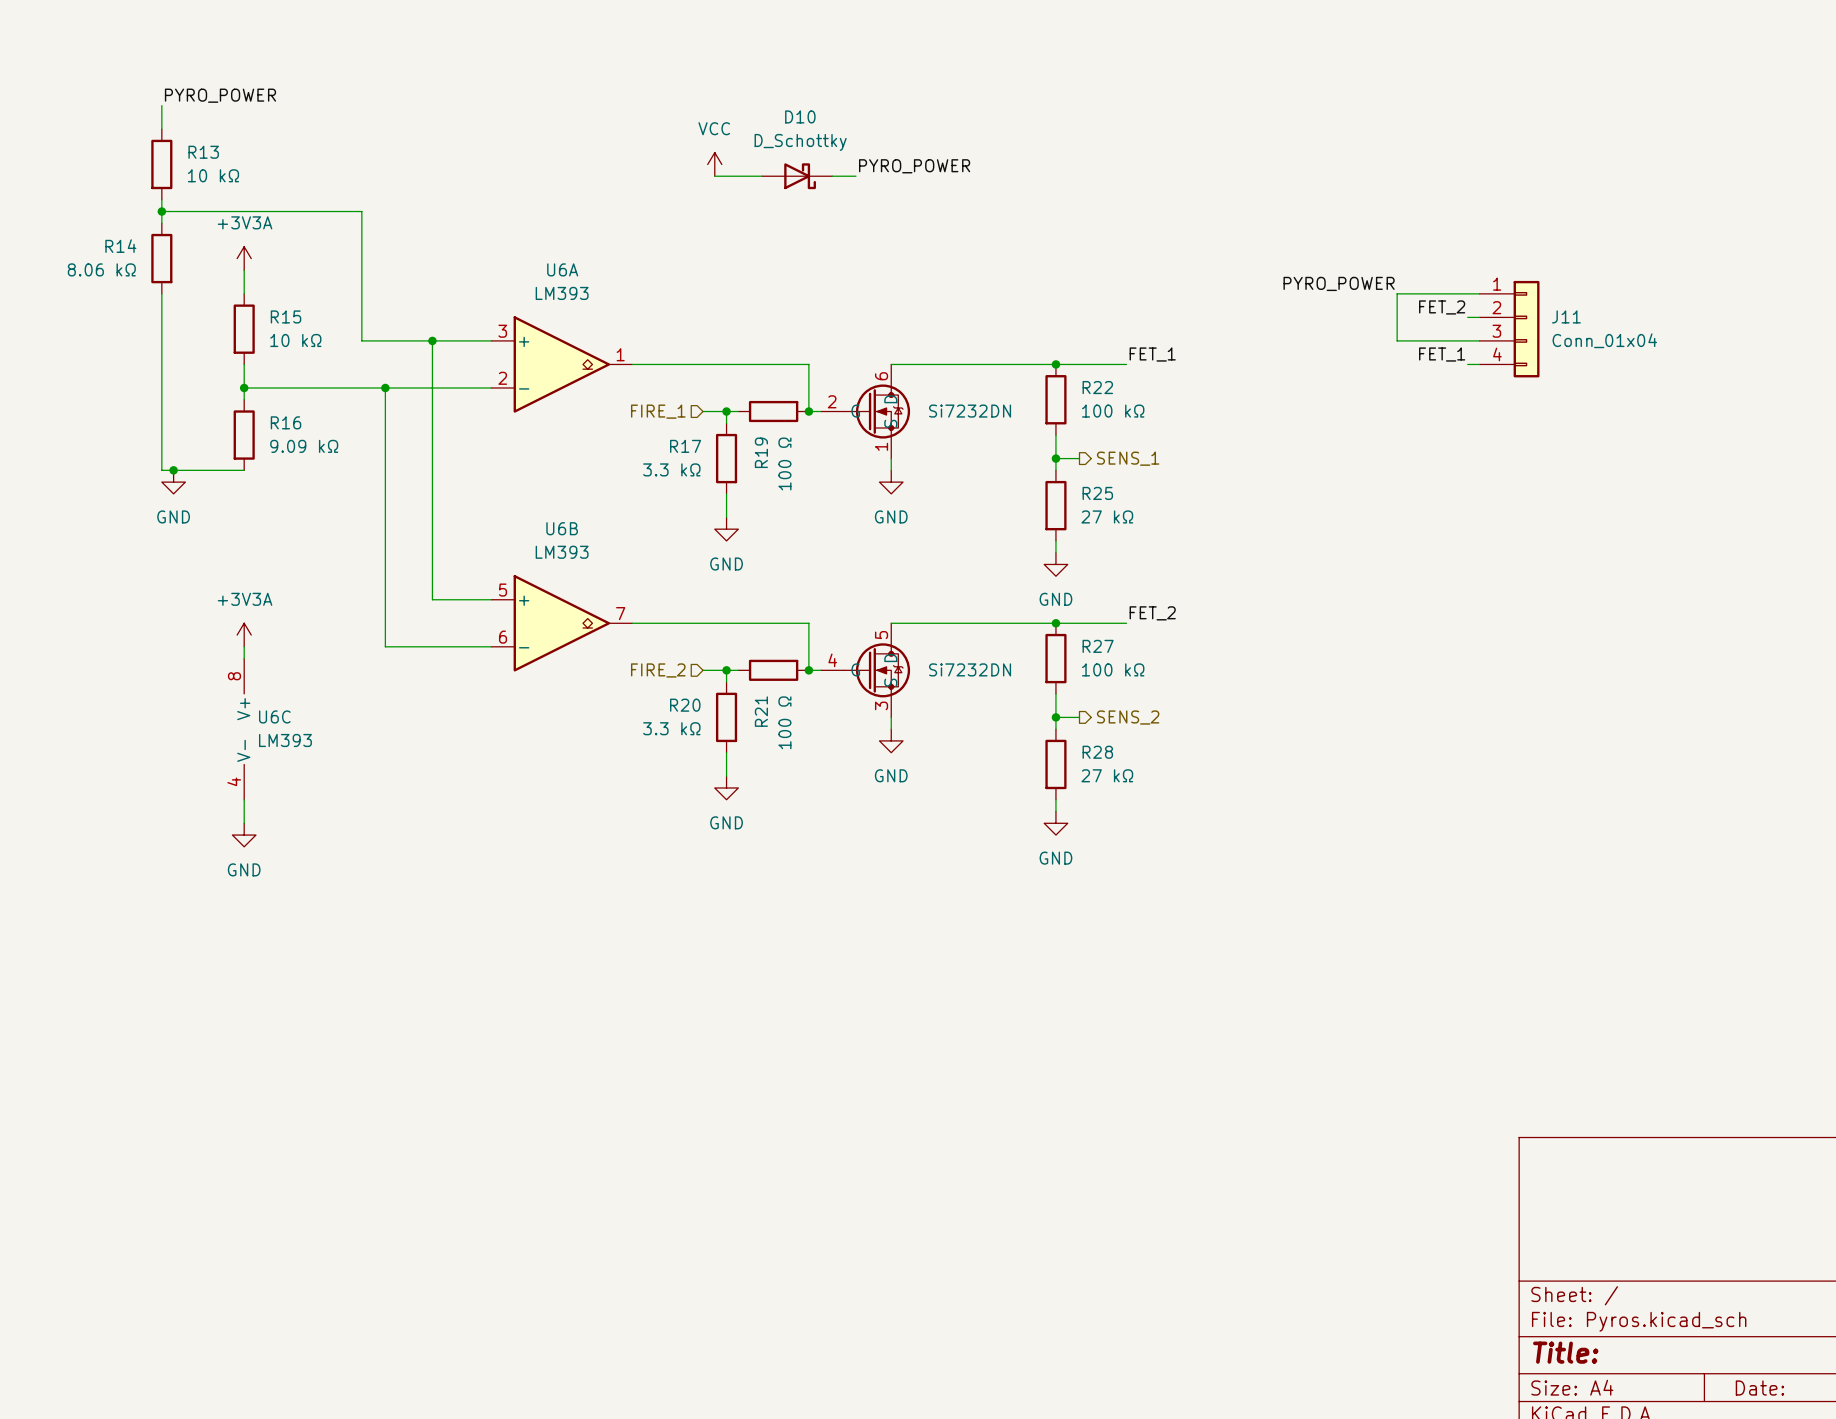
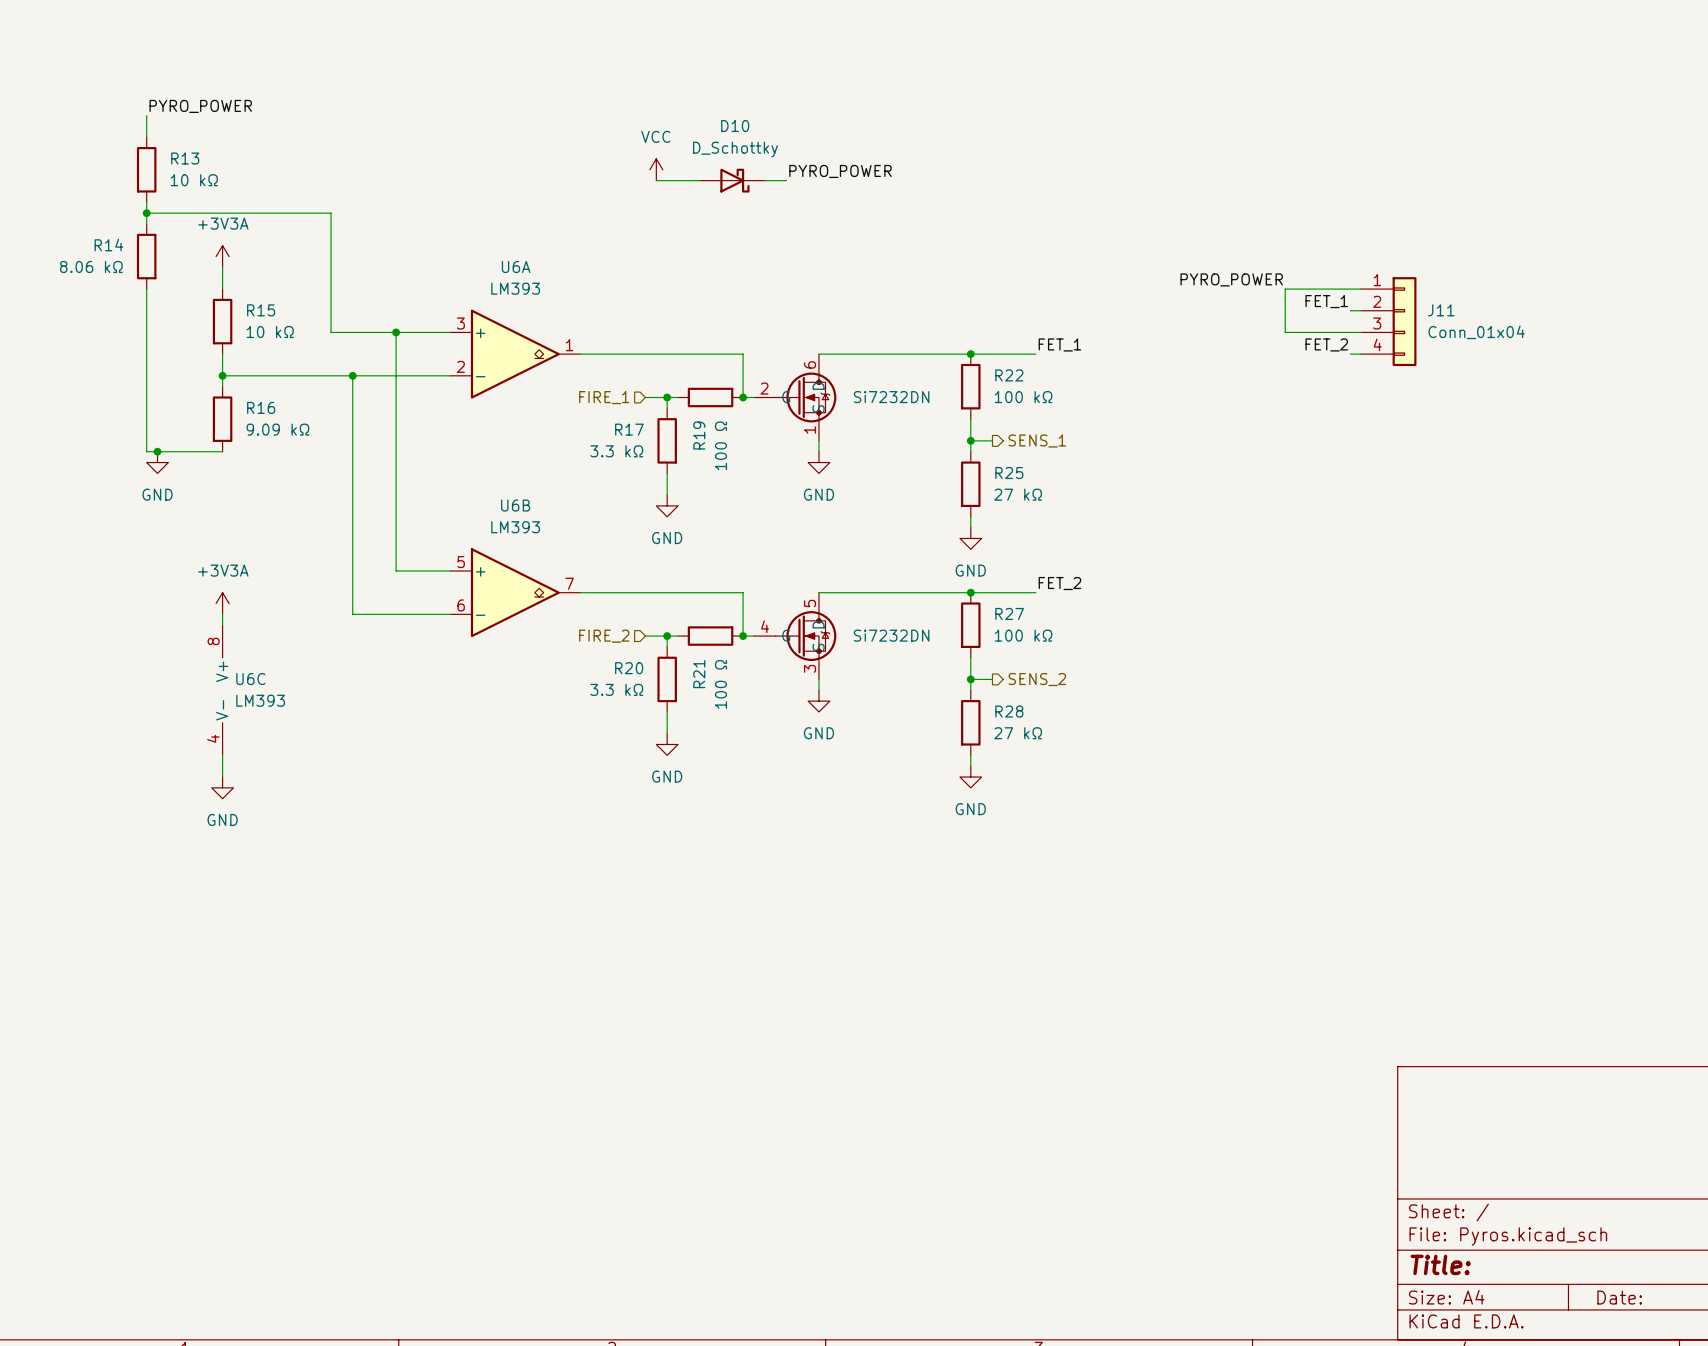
label: FET_2 (1442, 307) -> FET_1 (1326, 301)
label: FET_1 (1442, 354) -> FET_2 (1326, 344)

